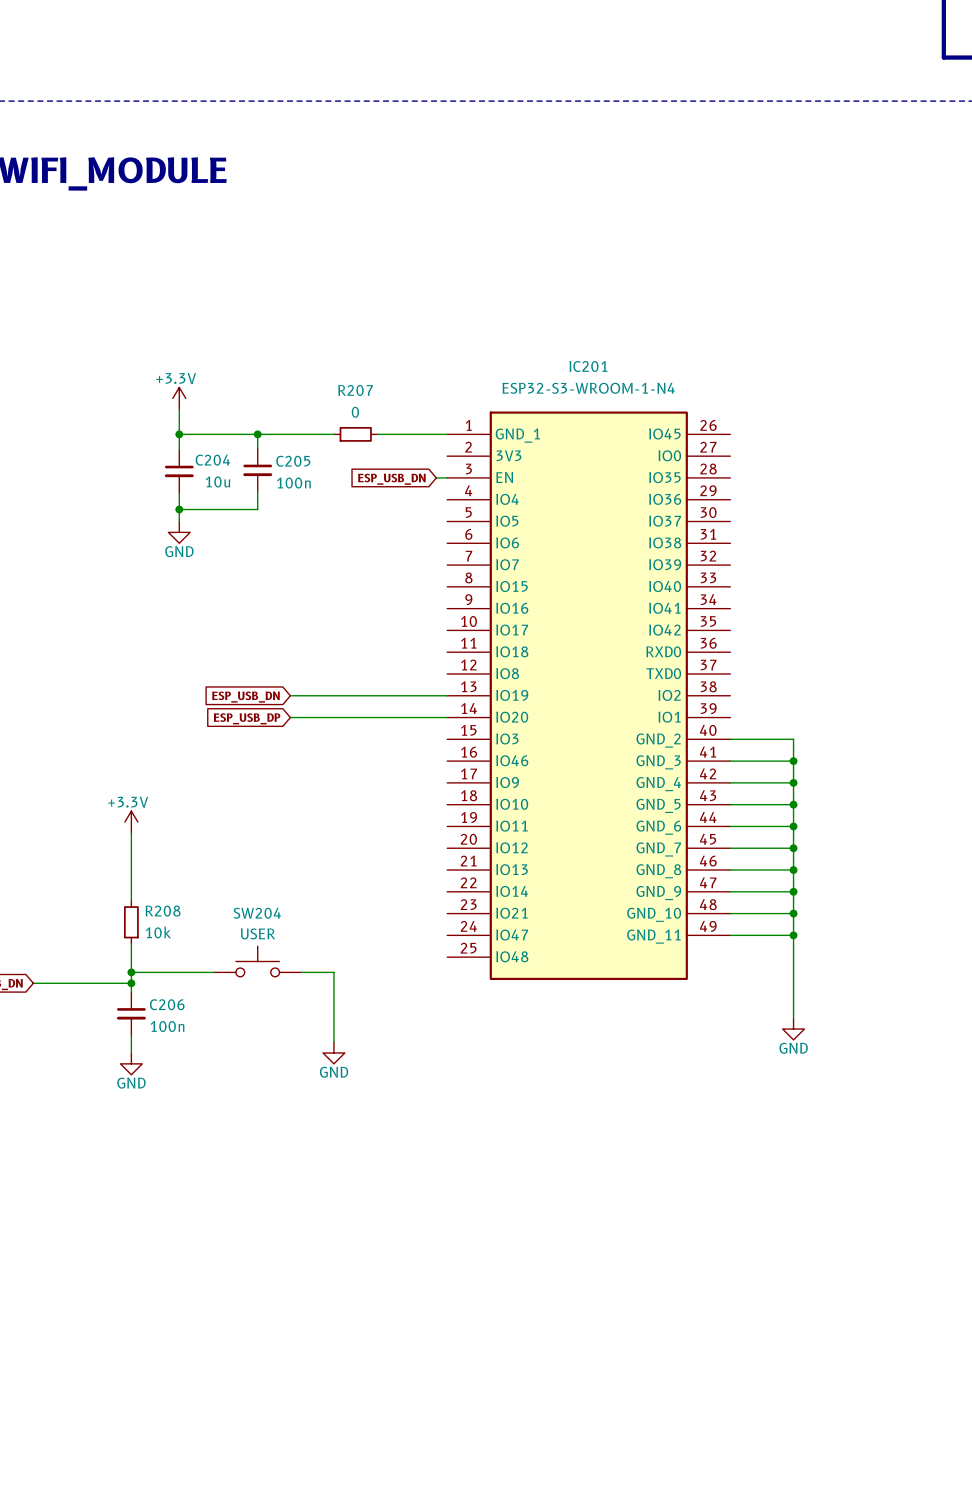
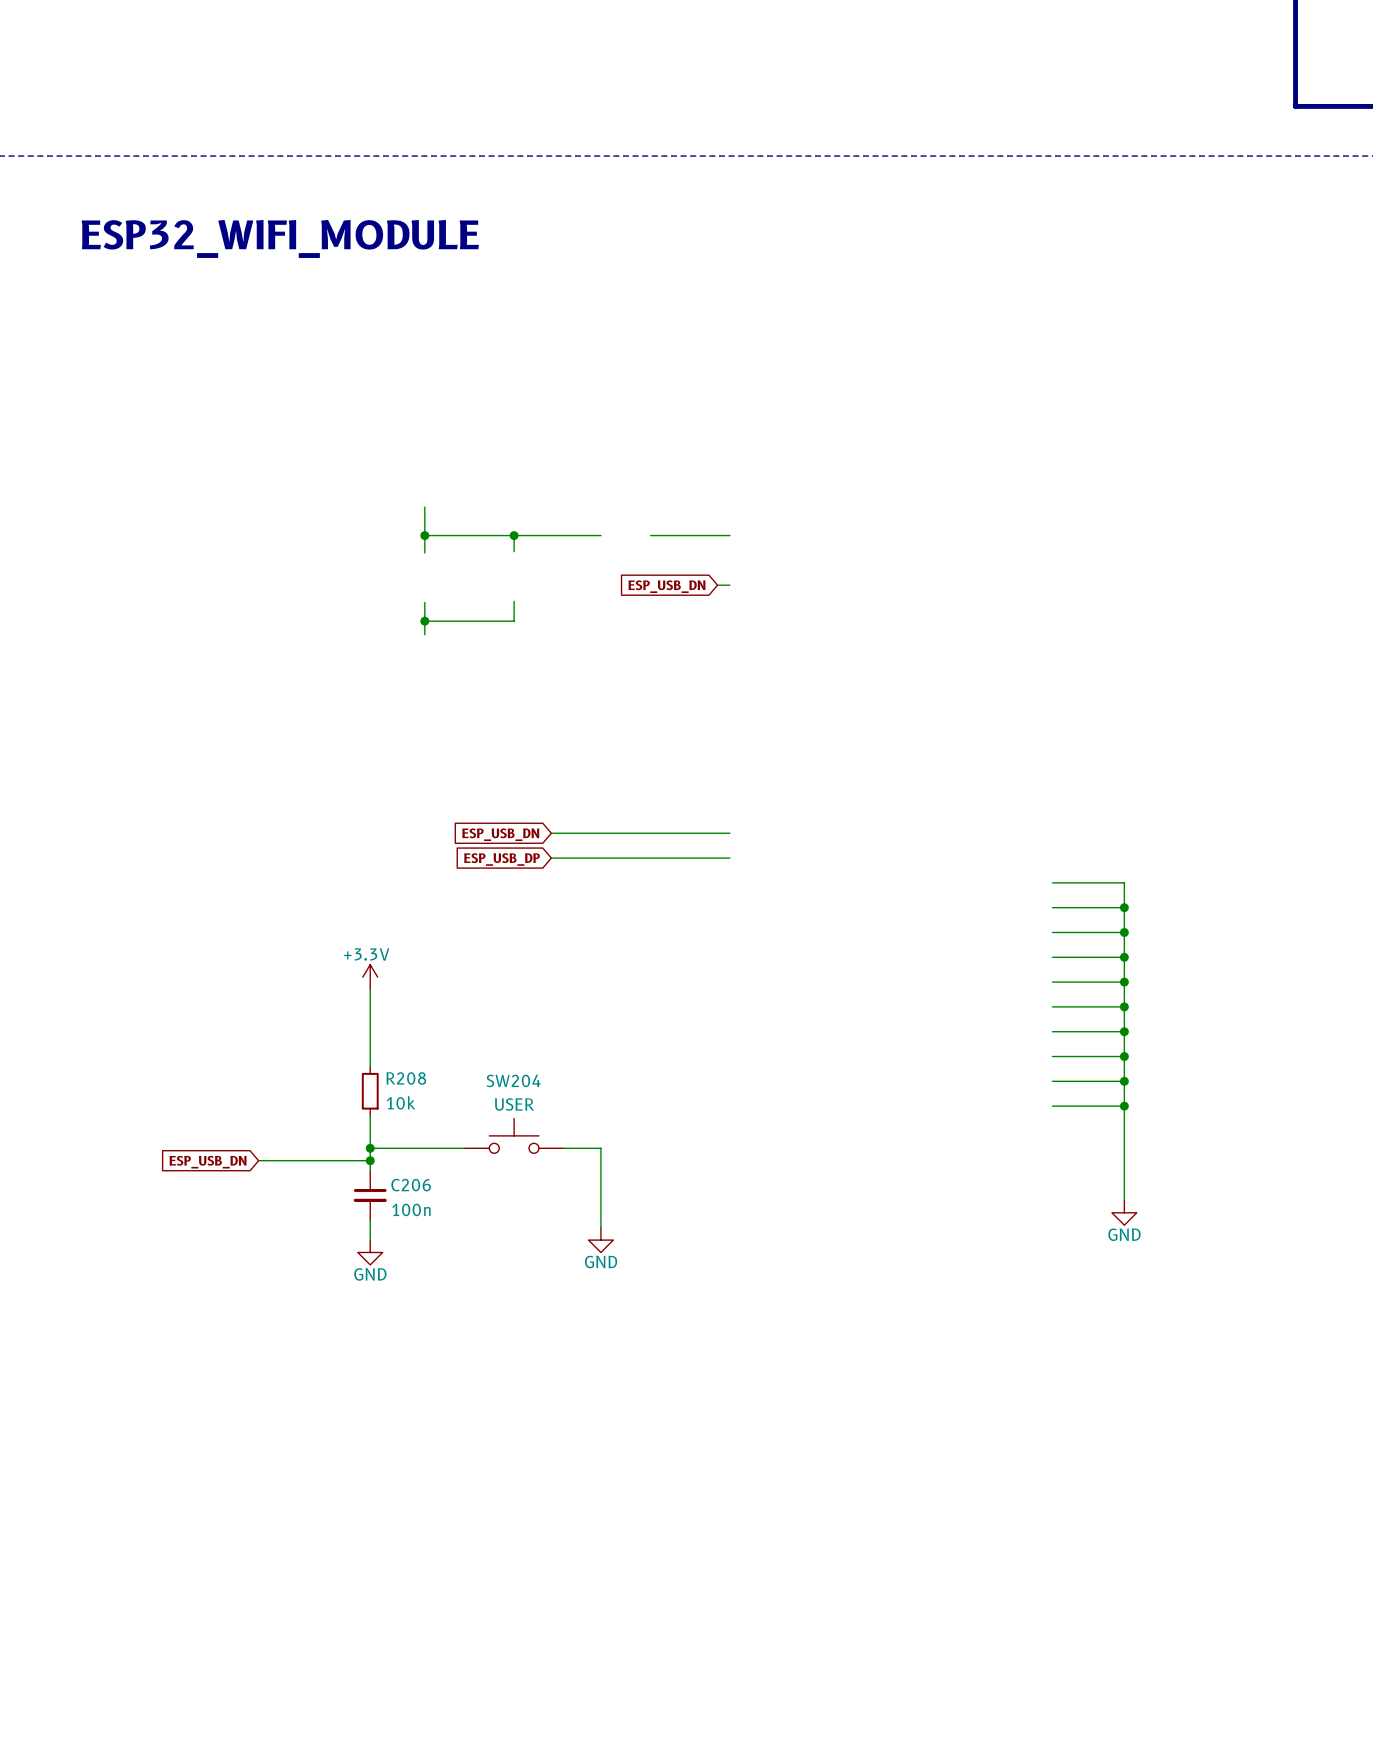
power symbol: +3.3V (179, 398) -> none
R207: 0 (355, 434) -> none
C205: 100n (257, 470) -> none
C204: 10u (179, 471) -> none
power symbol: GND (179, 532) -> none
IC201: ESP32-S3-WROOM-1-N4 (588, 695) -> none

